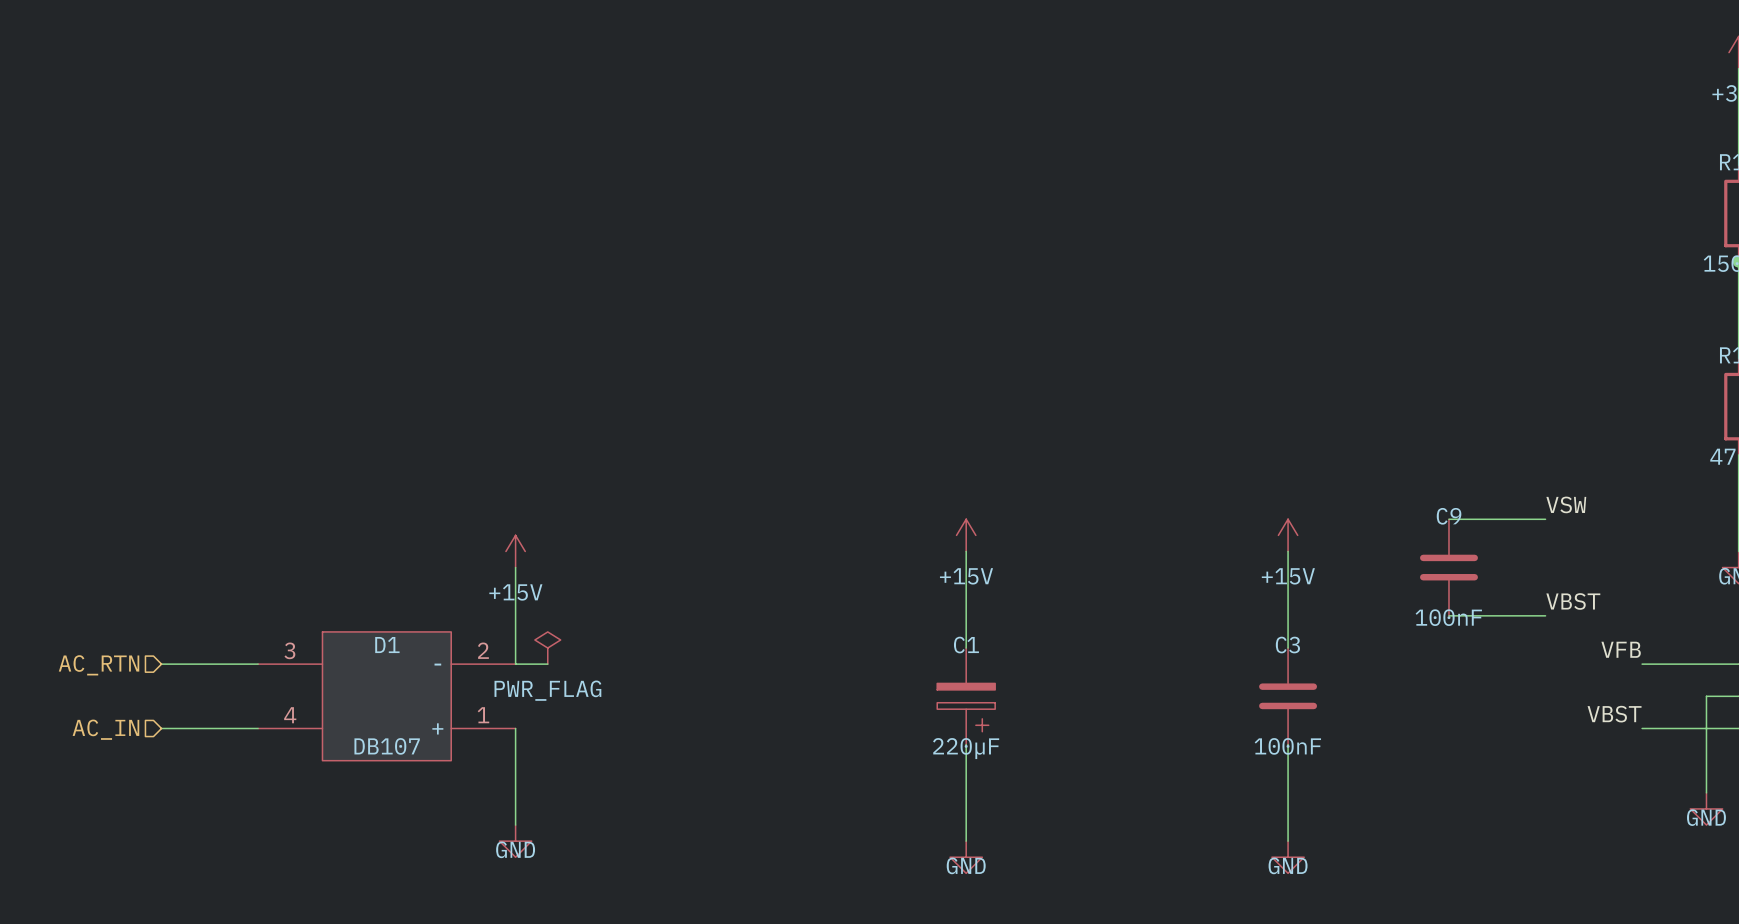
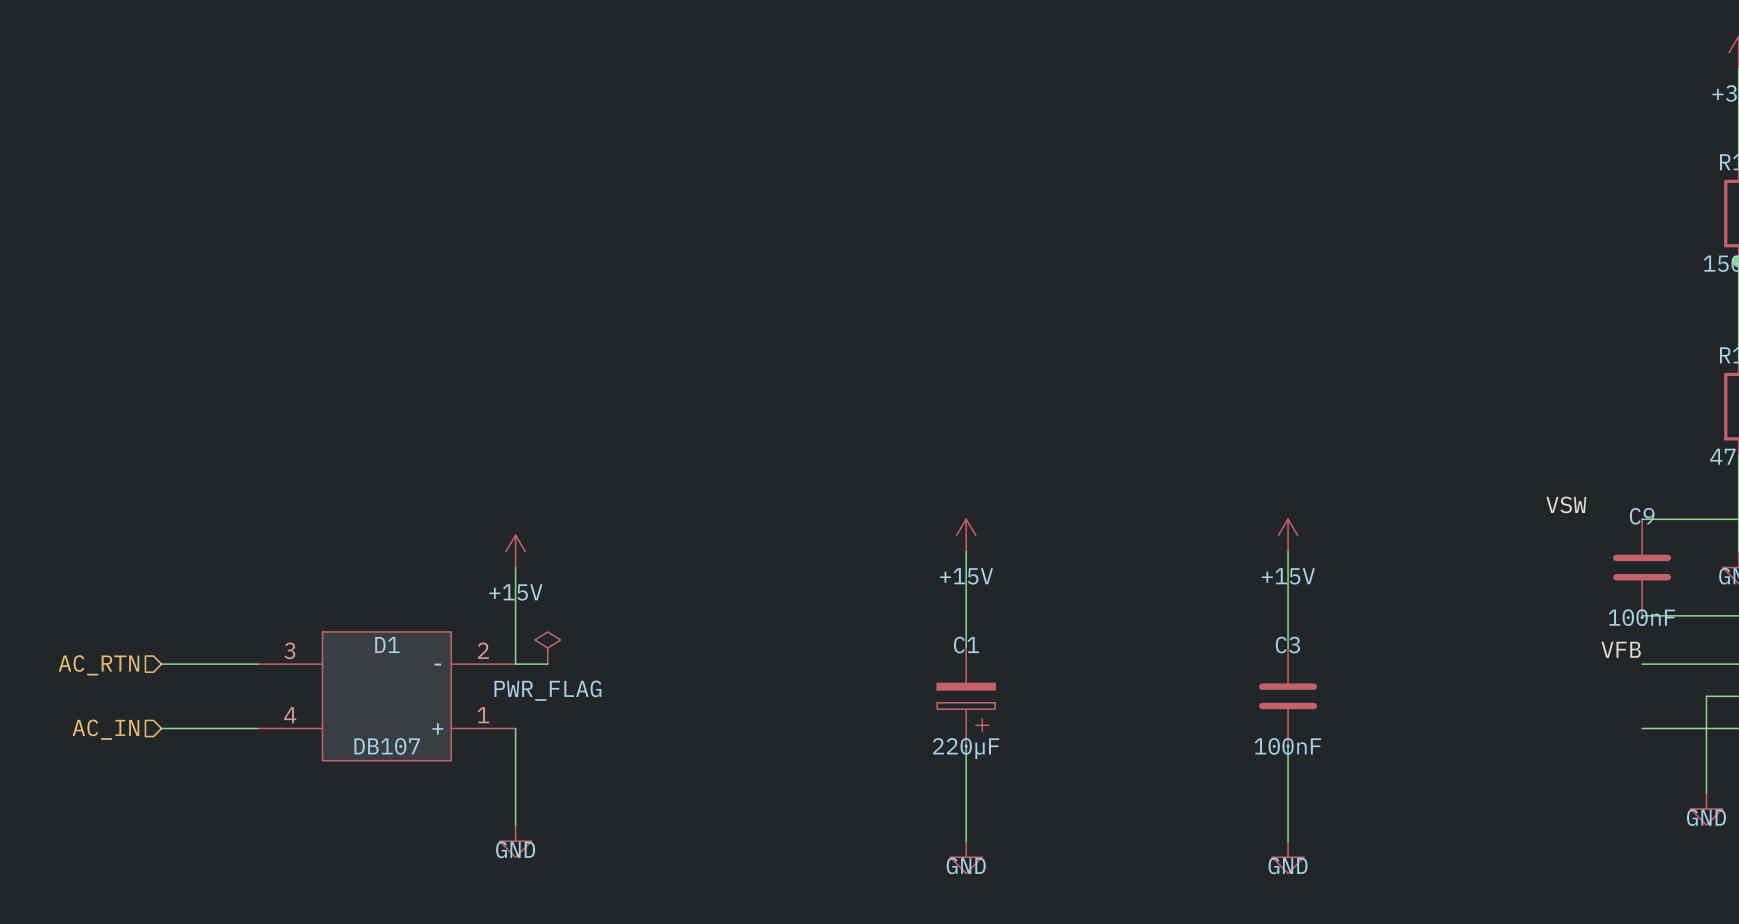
wire: (1448, 519) (1545, 519) -> (1642, 519) (1738, 519)
C9 position: (1448, 567) -> (1642, 567)
label: VBST (1573, 601) -> none
wire: (1448, 615) (1545, 615) -> (1642, 615) (1738, 615)
label: VBST (1614, 714) -> none

